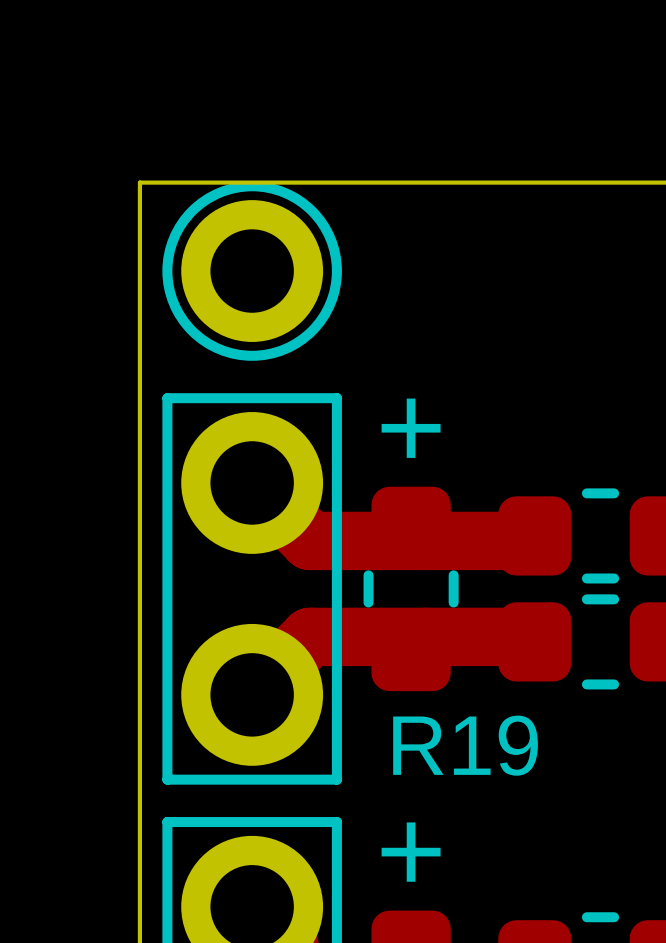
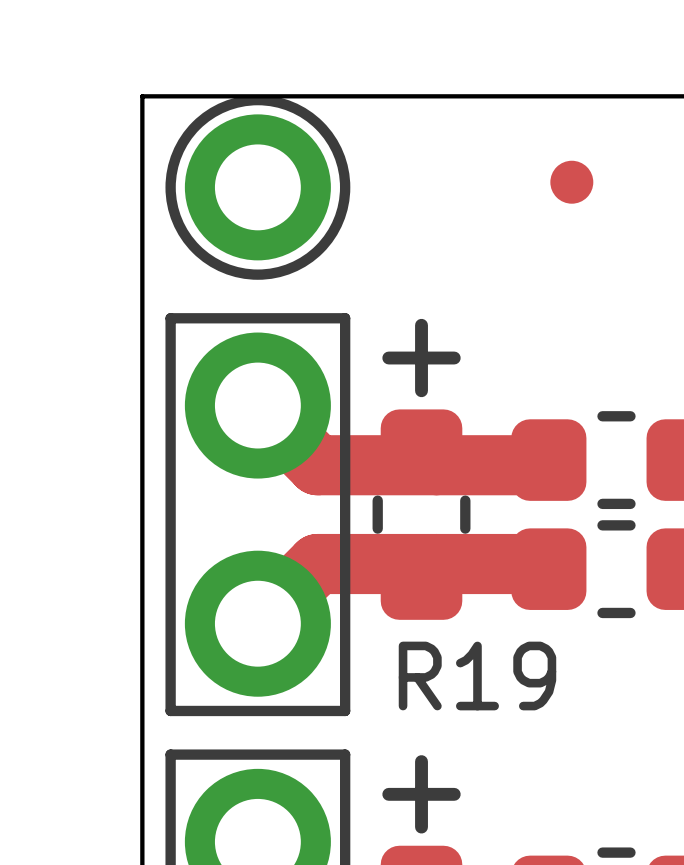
part: none -> (571, 182)

